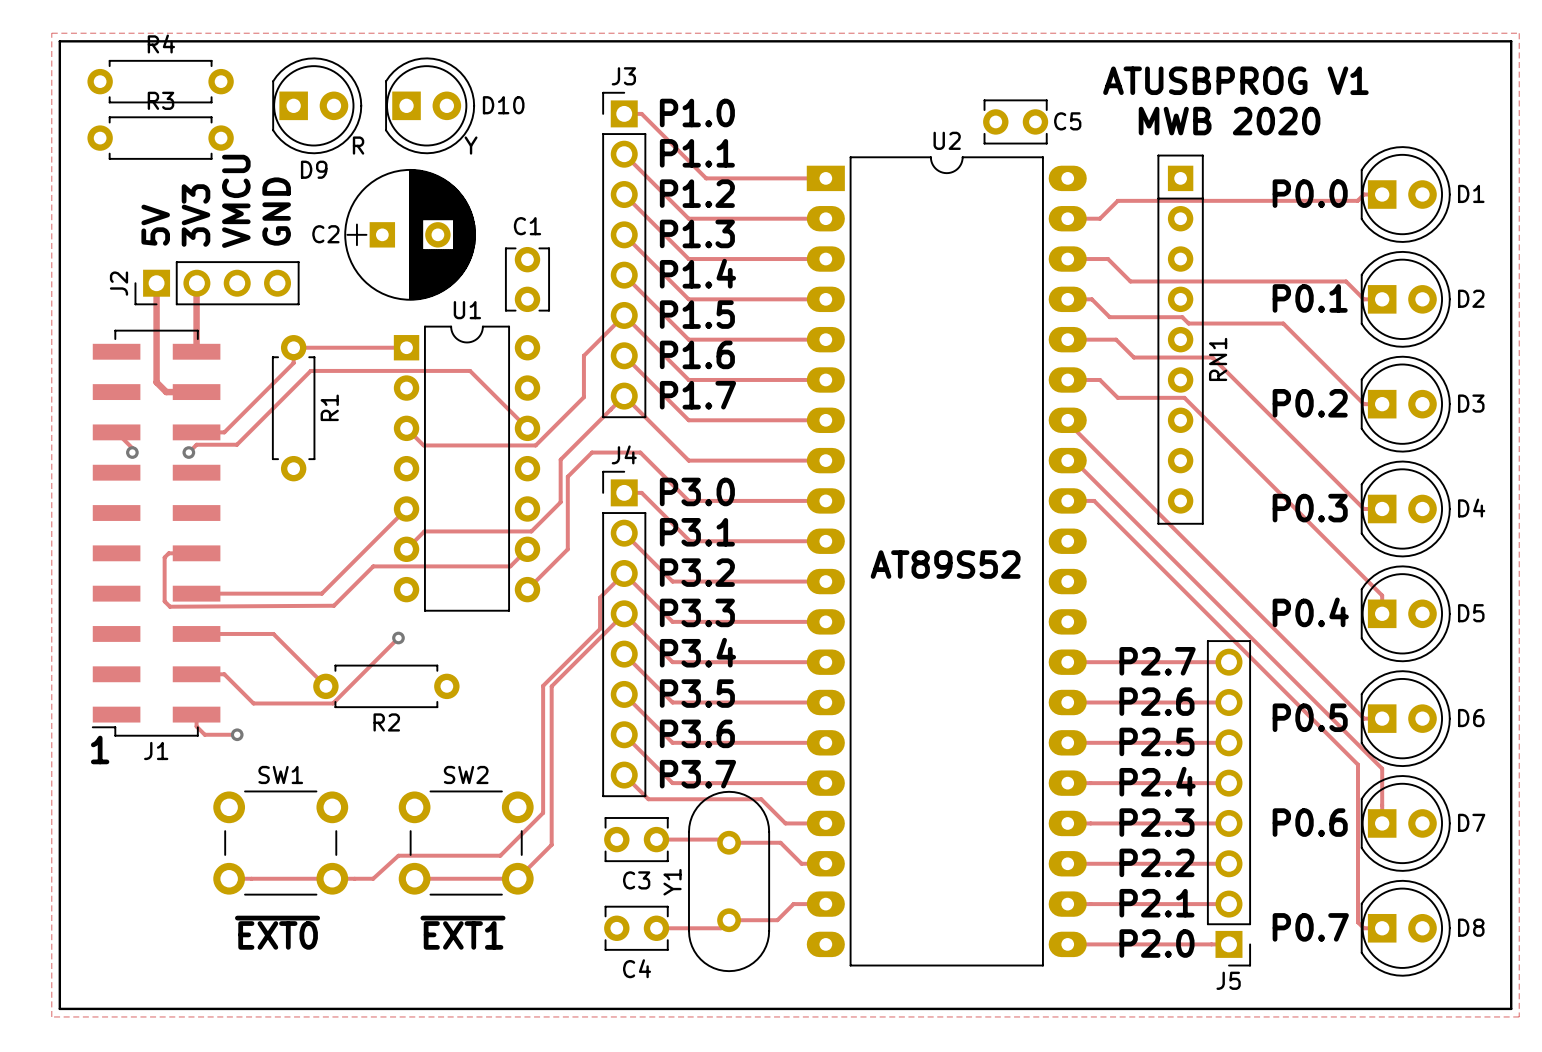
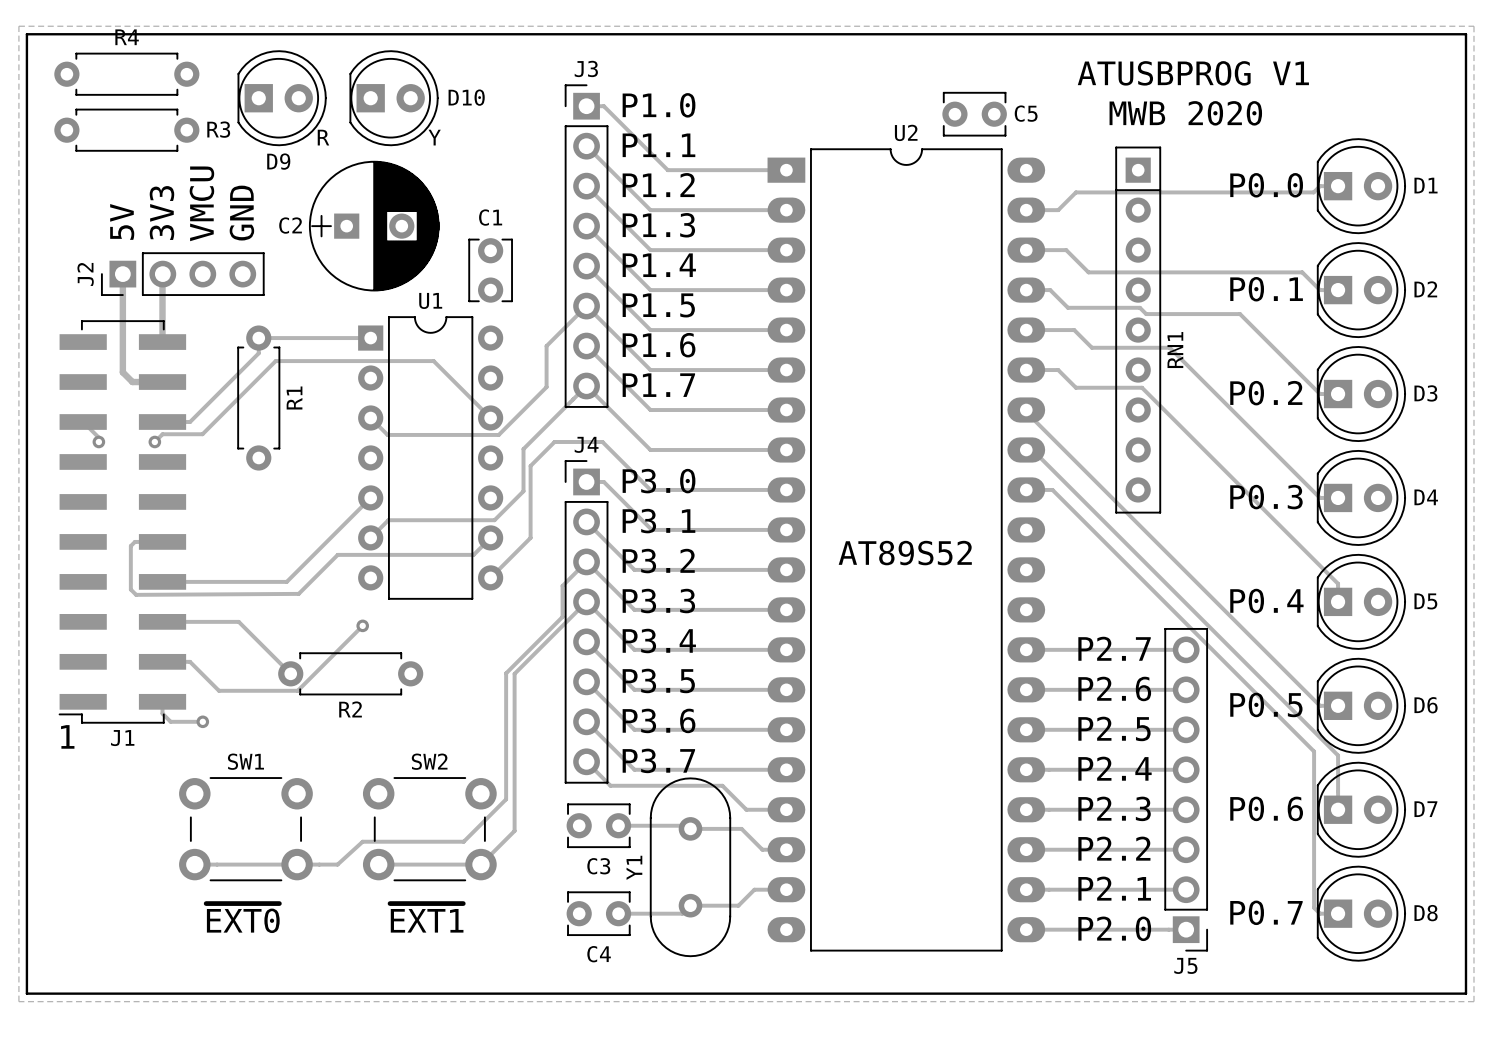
R3 name position: R3 (160, 100) -> R3 (218, 129)

